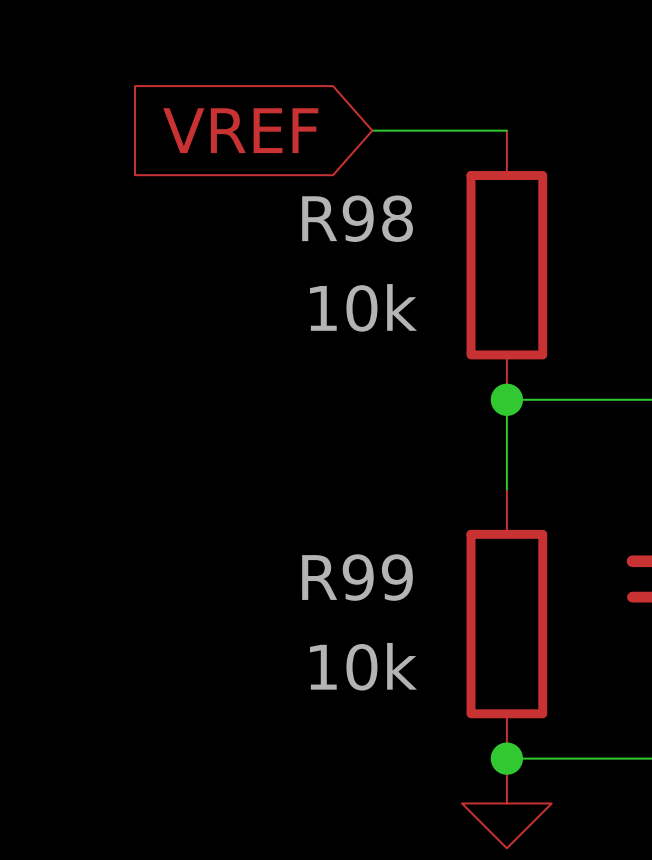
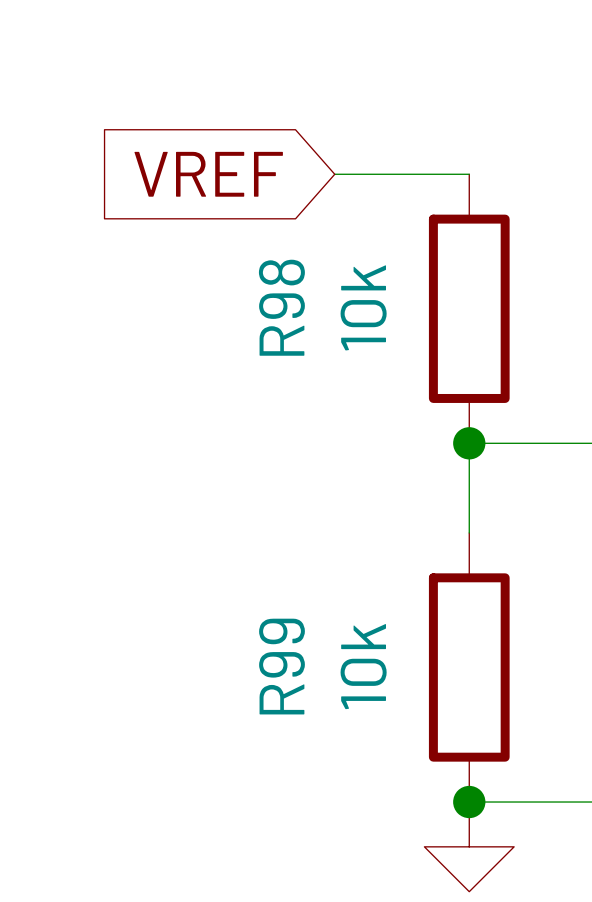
R98 name rotation: 0° (357, 218) -> 90° counterclockwise (281, 307)
R98 value rotation: 0° (363, 307) -> 90° counterclockwise (363, 307)
R99 name rotation: 0° (357, 577) -> 90° counterclockwise (282, 666)
R99 value rotation: 0° (363, 666) -> 90° counterclockwise (363, 666)

